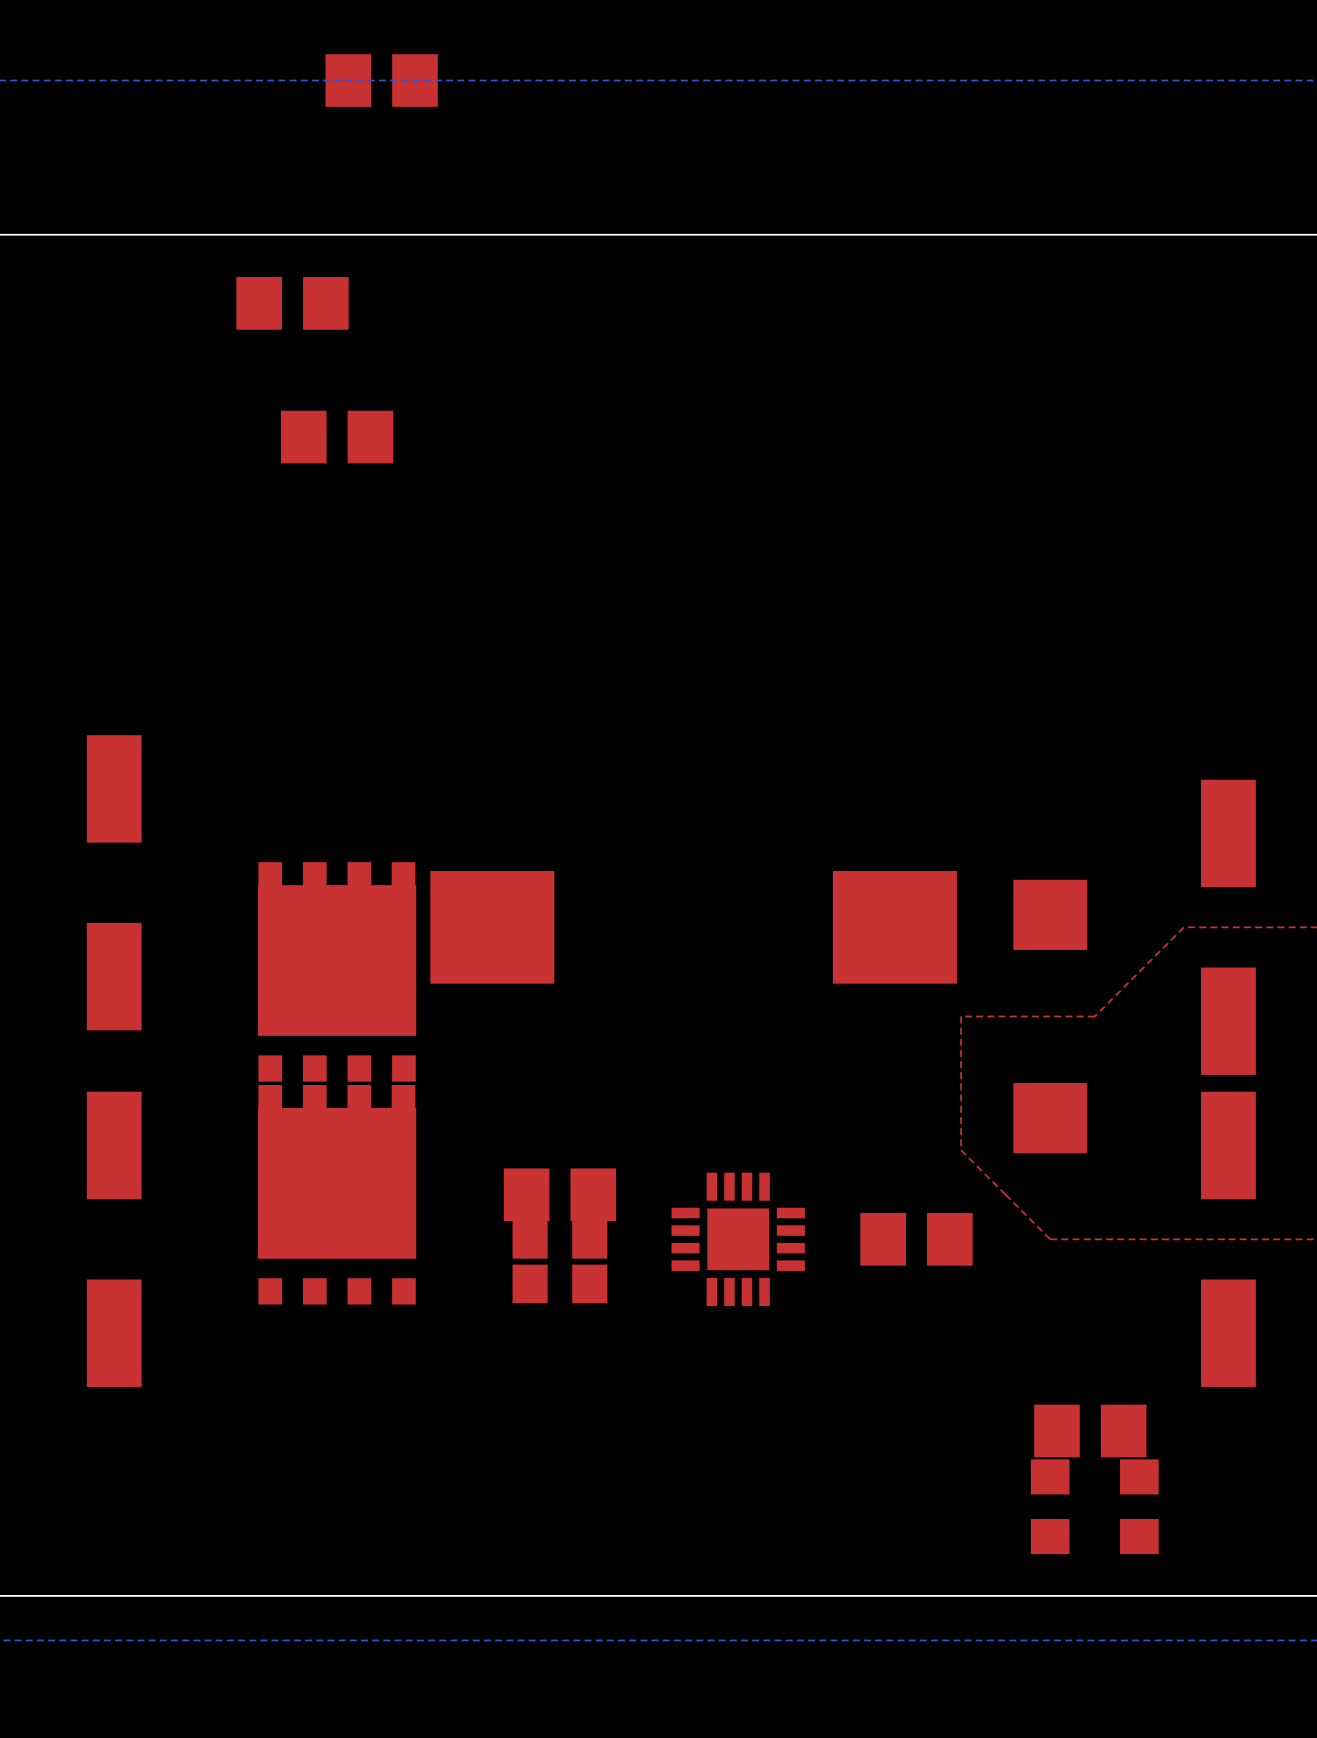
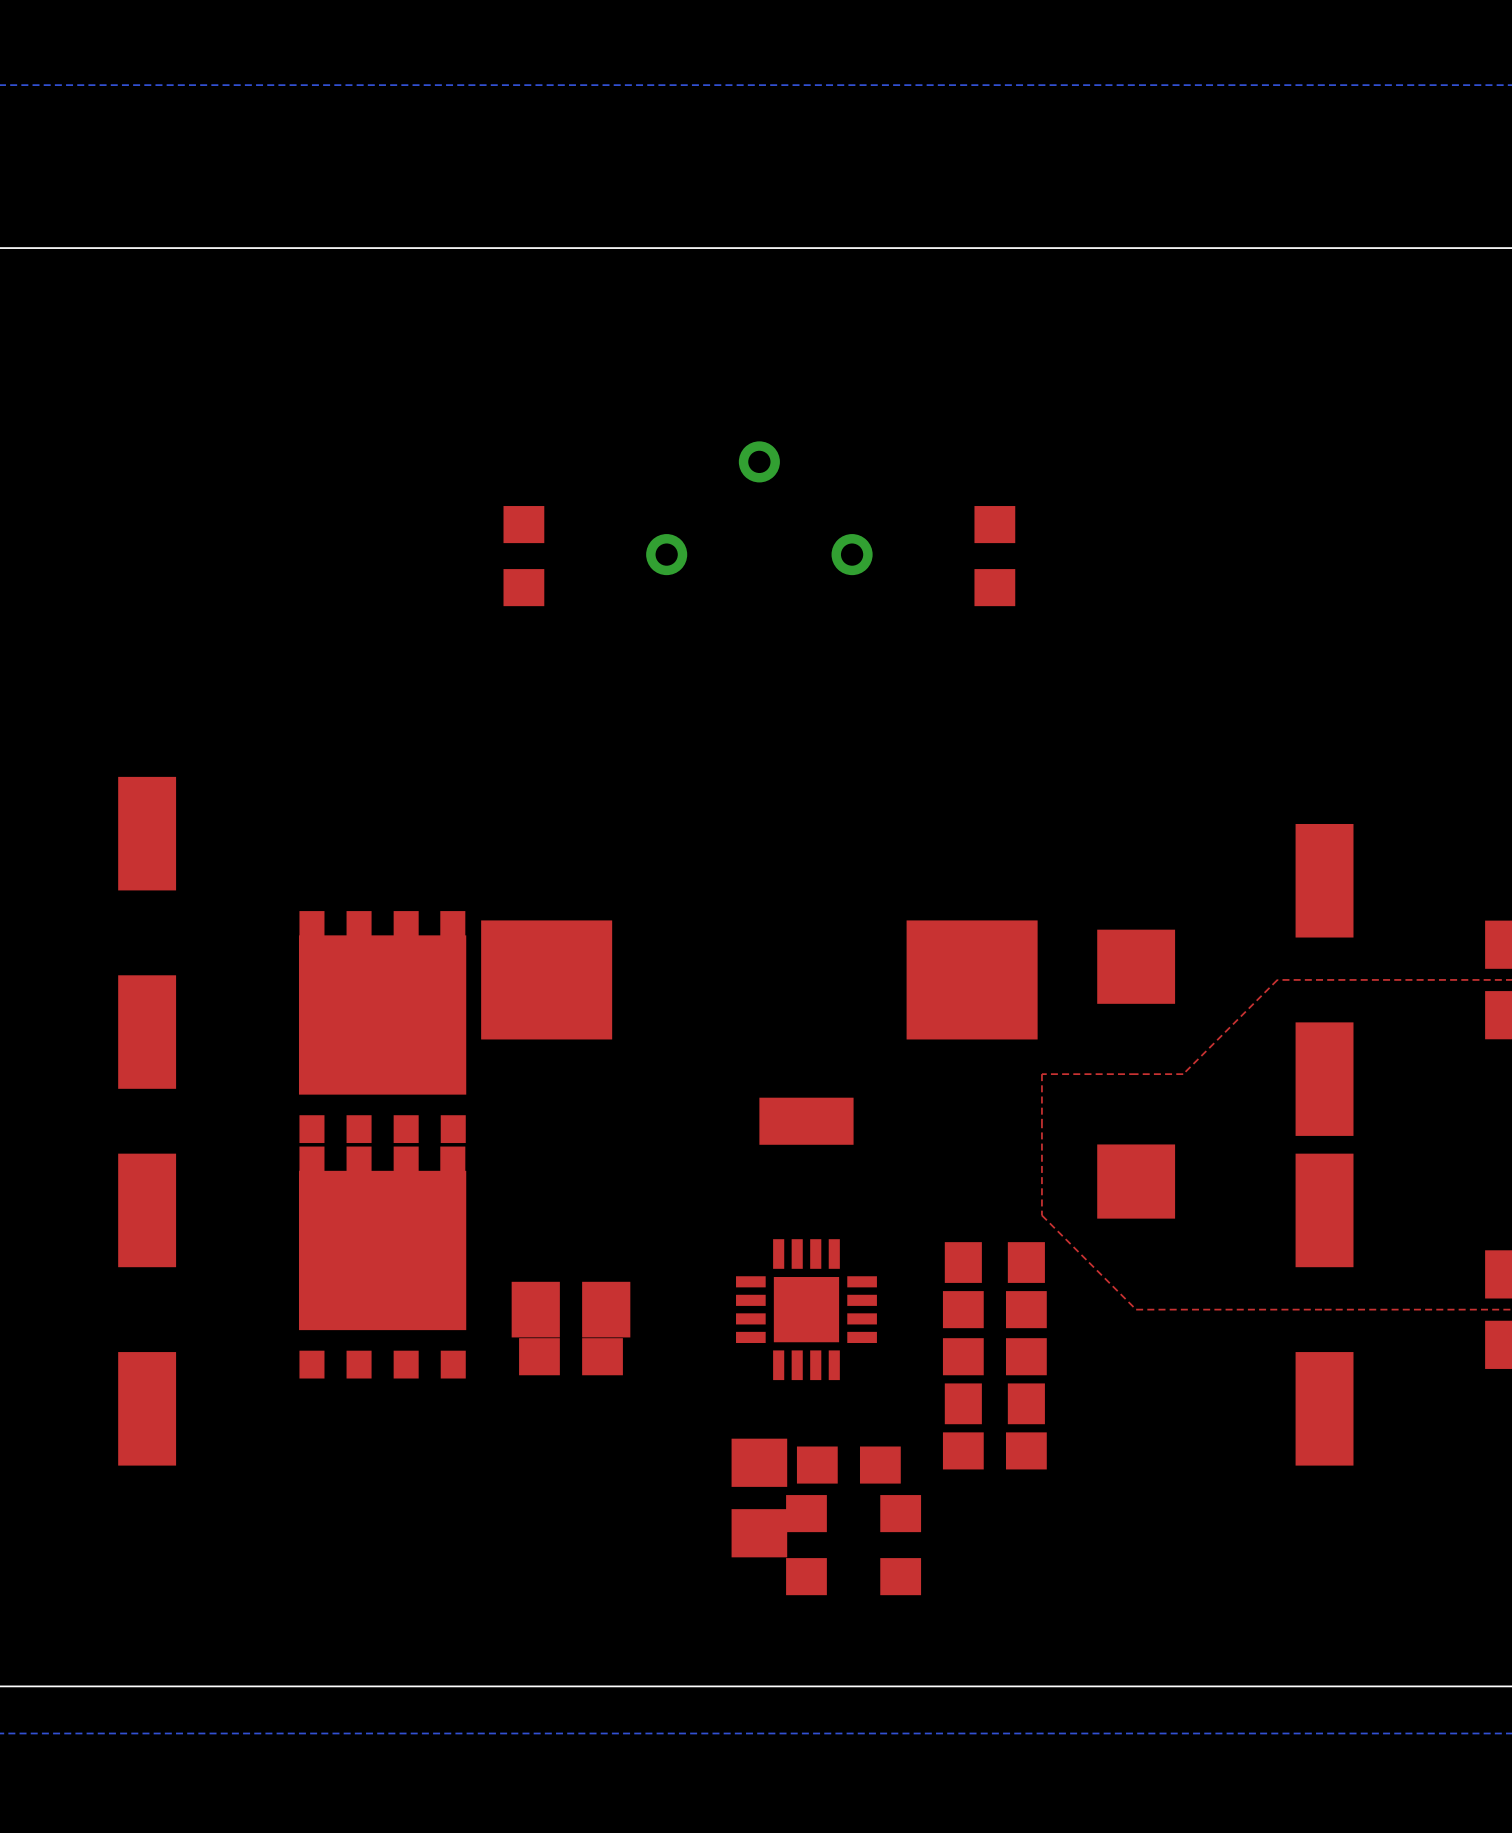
part: (381, 80) -> none
part: (292, 303) -> none
part: (337, 437) -> none
part: none -> (759, 508)
part: none -> (523, 556)
part: none -> (994, 556)
part: none -> (806, 1121)
part position: (559, 1194) -> (570, 1309)
part: none -> (994, 1262)
part footprint: [860, 1213, 973, 1266] -> [942, 1291, 1047, 1329]
part: (559, 1239) -> none
part: none -> (570, 1356)
part: (559, 1283) -> none
part: none -> (994, 1356)
part: none -> (994, 1403)
part: none -> (994, 1450)
part: none -> (848, 1465)
part: none -> (759, 1498)
part: (1090, 1430) -> none
part: none -> (806, 1545)
part: none -> (900, 1545)
part: (1050, 1506) -> none
part: (1139, 1506) -> none

